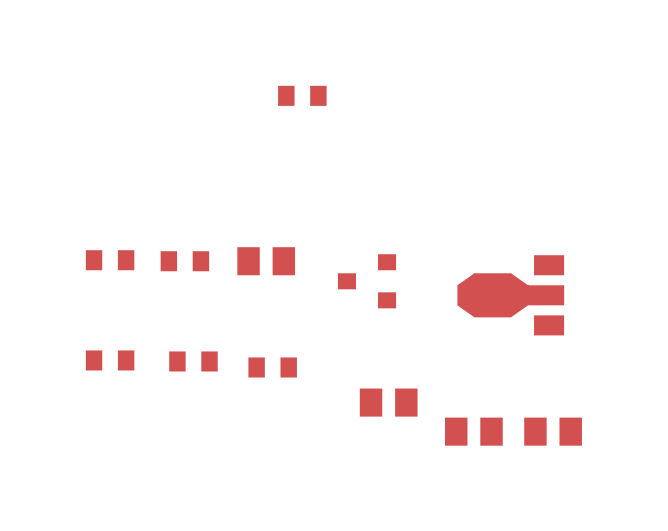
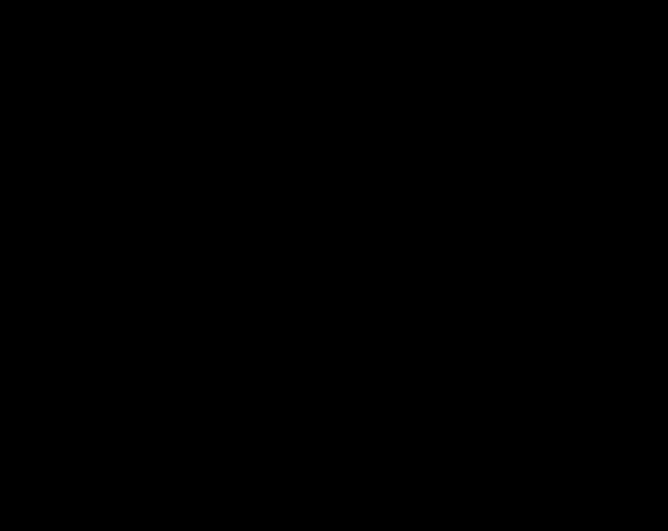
part: (302, 95) -> none
part: (110, 260) -> none
part: (184, 261) -> none
part: (266, 261) -> none
part: (366, 281) -> none
part: (510, 295) -> none
part: (110, 360) -> none
part: (193, 361) -> none
part: (272, 367) -> none
part: (388, 402) -> none
part: (473, 431) -> none
part: (553, 431) -> none

